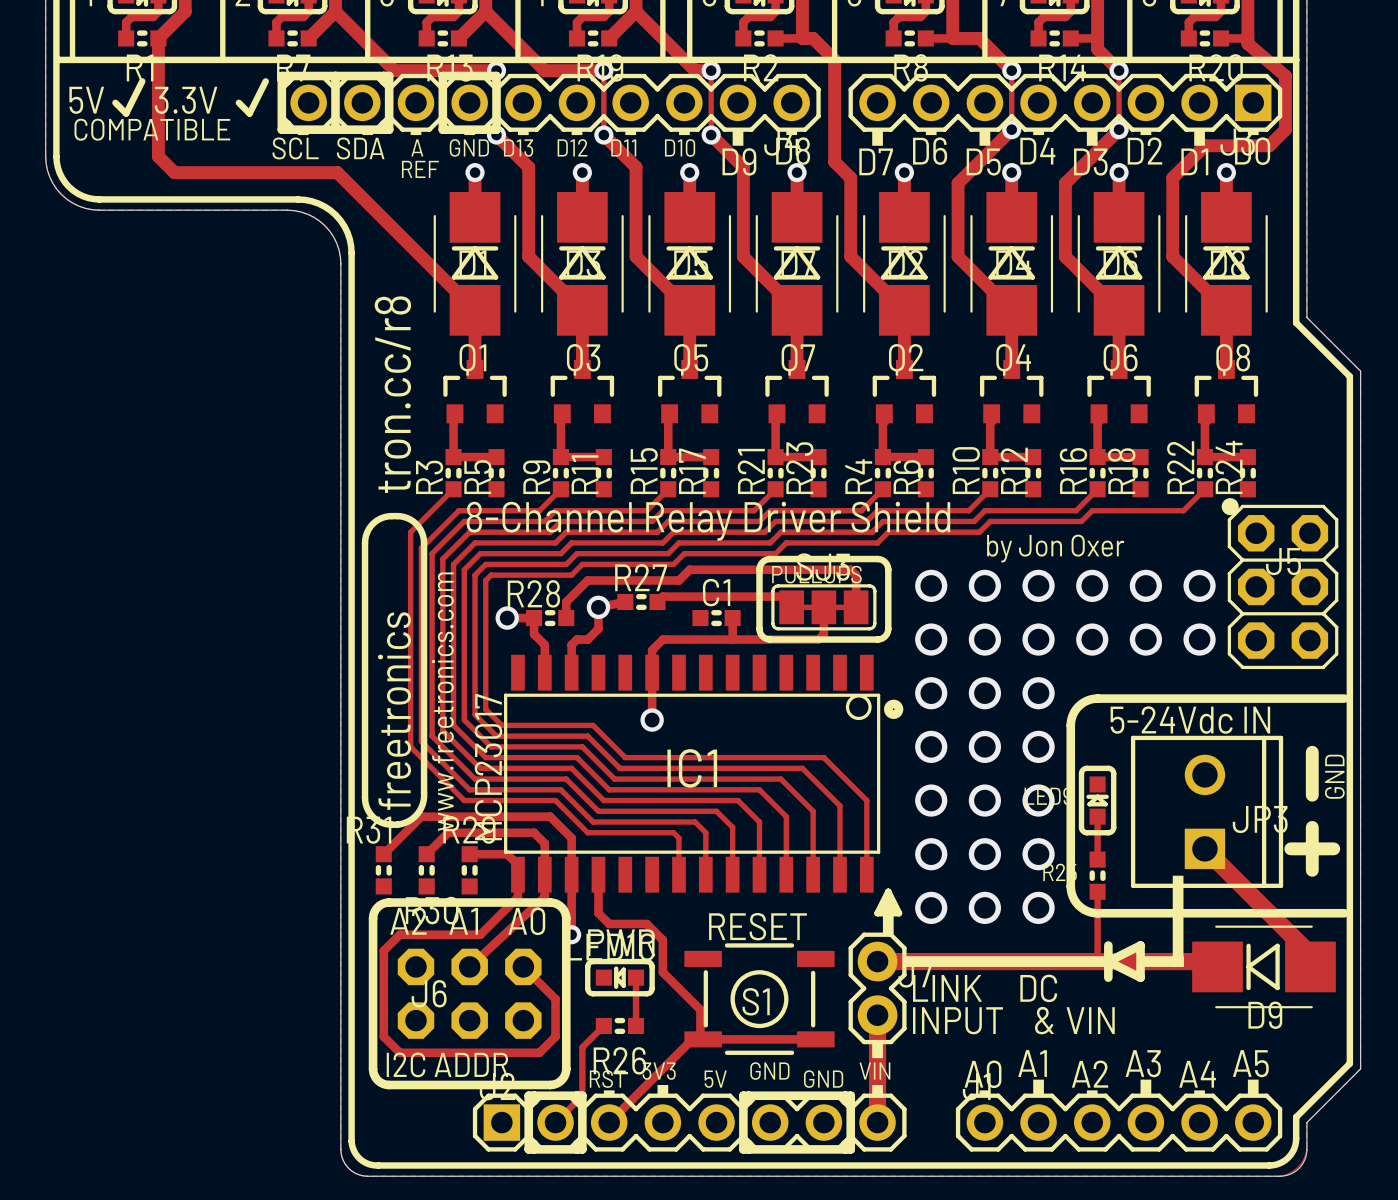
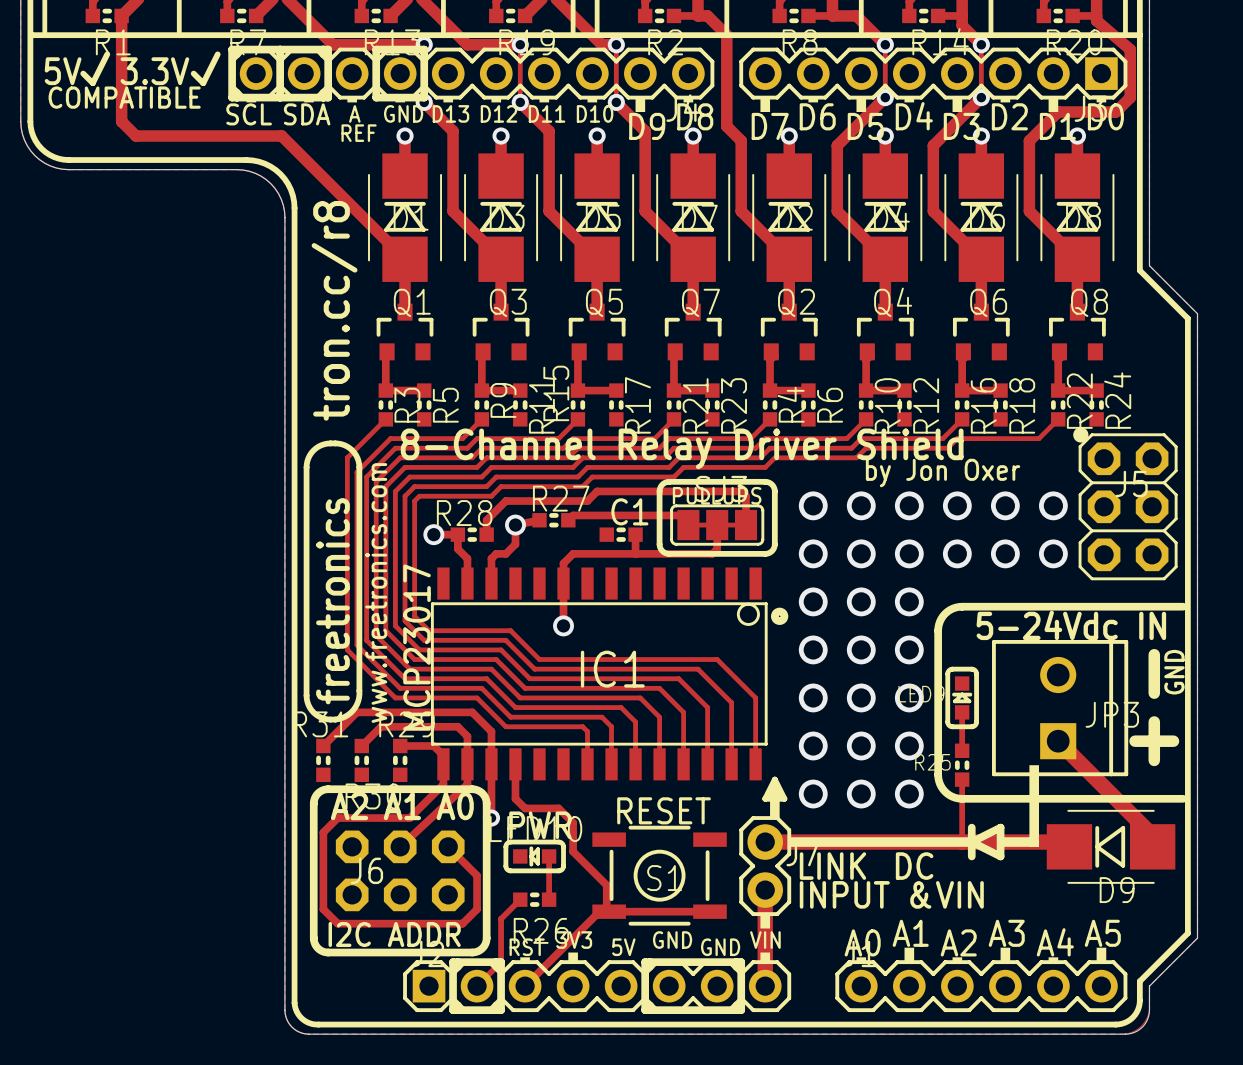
R22 name position: R22 (1180, 467) -> R22 (1079, 401)
R24 name position: R24 (1228, 467) -> R24 (1117, 400)
R23 name position: R23 (799, 468) -> R23 (734, 405)
R10 name position: R10 (966, 470) -> R10 (887, 405)
R12 name position: R12 (1014, 470) -> R12 (926, 405)
R17 name position: R17 (692, 471) -> R17 (637, 405)
R21 name position: R21 (751, 471) -> R21 (695, 405)
R16 name position: R16 (1073, 471) -> R16 (983, 405)
R18 name position: R18 (1121, 471) -> R18 (1022, 405)
R11 name position: R11 (585, 474) -> R11 (541, 405)
R4 name position: R4 (858, 476) -> R4 (791, 404)
R3 name position: R3 (429, 477) -> R3 (407, 405)
R5 name position: R5 (477, 477) -> R5 (445, 405)
R9 name position: R9 (536, 477) -> R9 (503, 400)
R6 name position: R6 (907, 477) -> R6 (830, 405)

